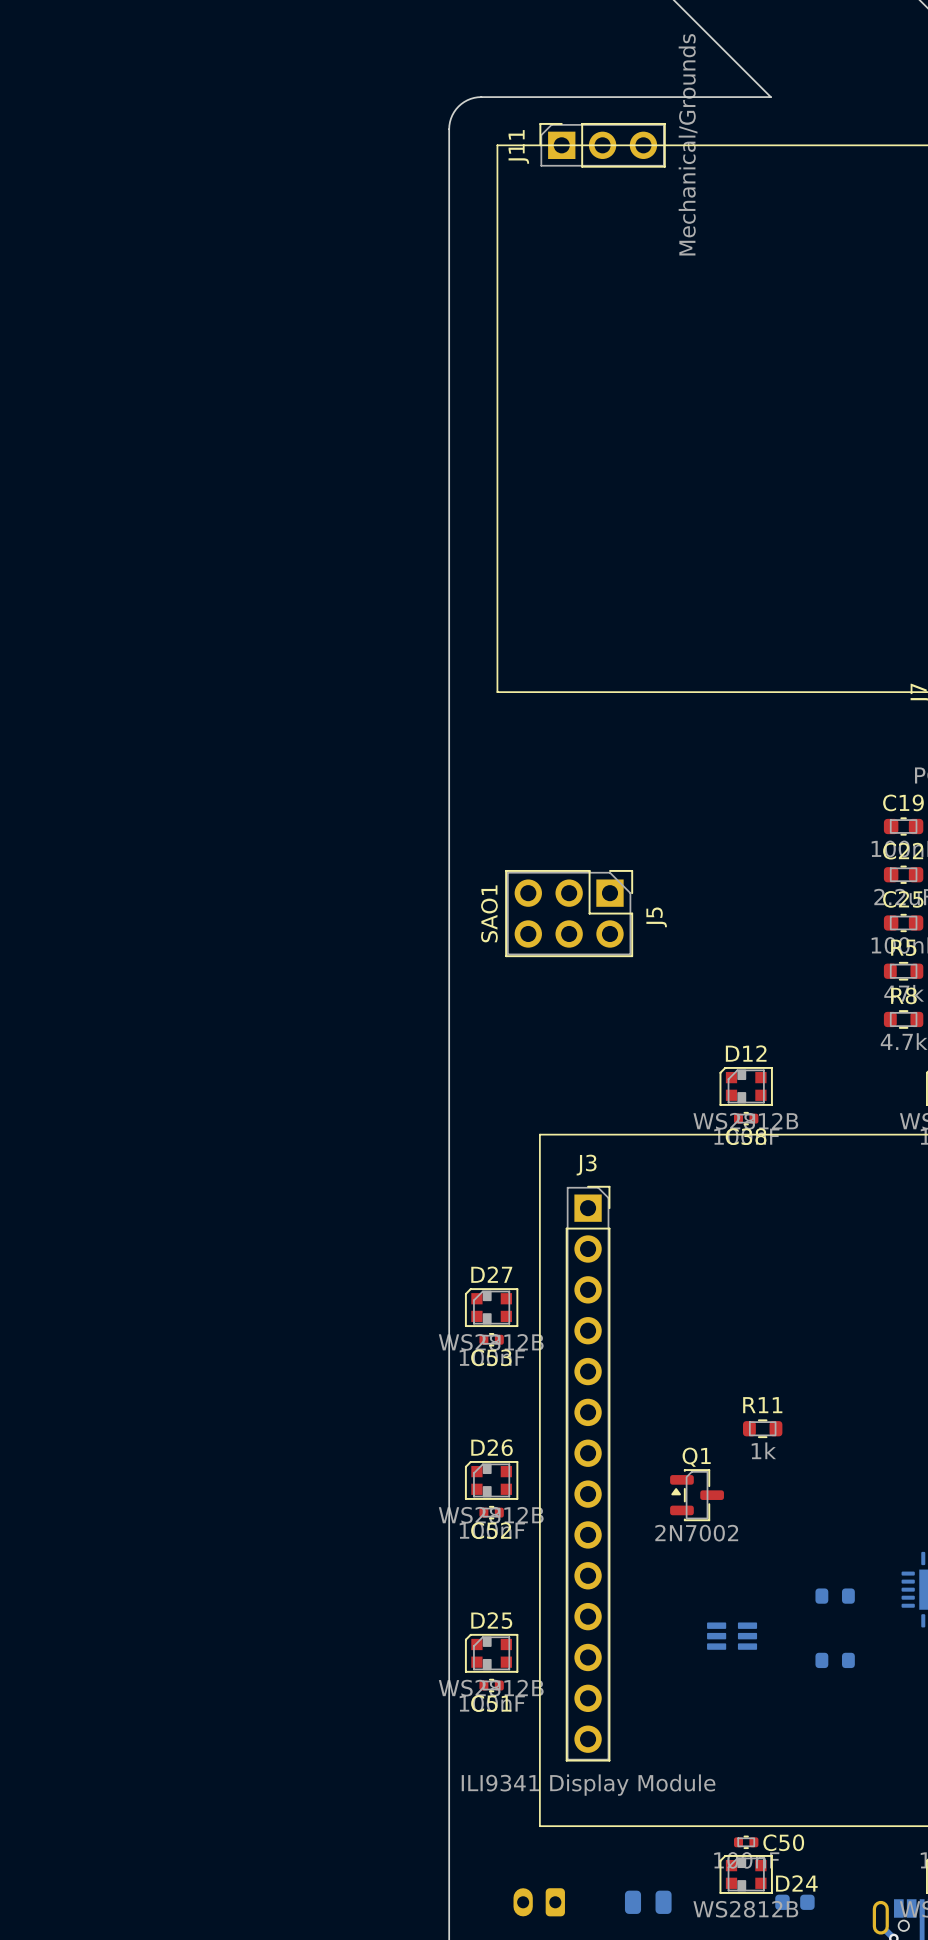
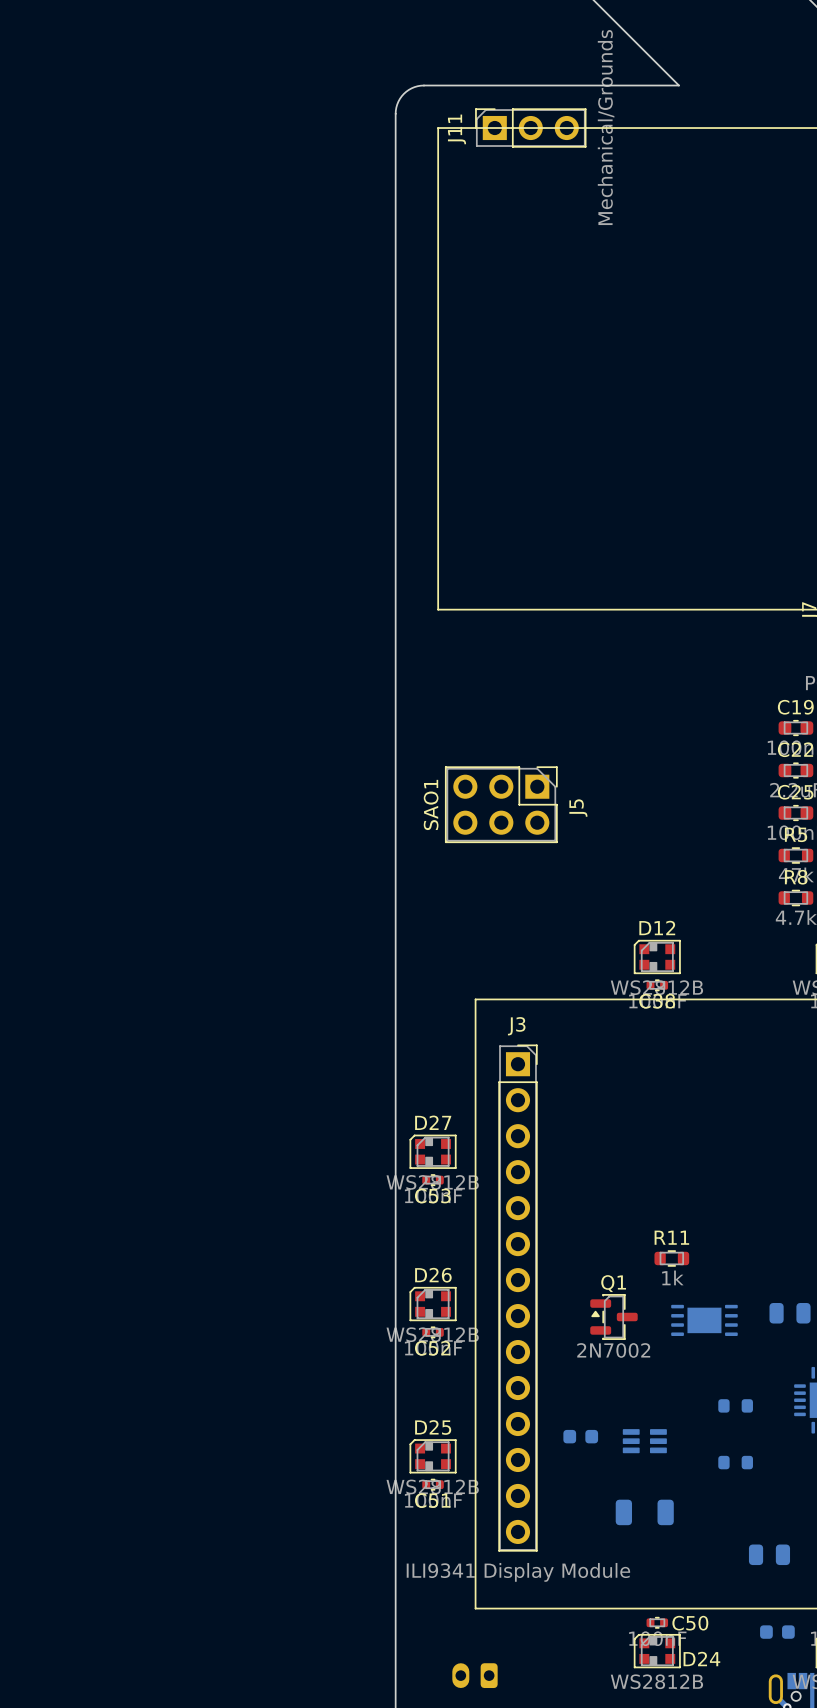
part: none -> (790, 1313)
part: none -> (704, 1320)
part: none -> (580, 1436)
part: none -> (644, 1512)
part: none -> (769, 1554)
part: (648, 1902) -> none
part position: (794, 1902) -> (777, 1632)

